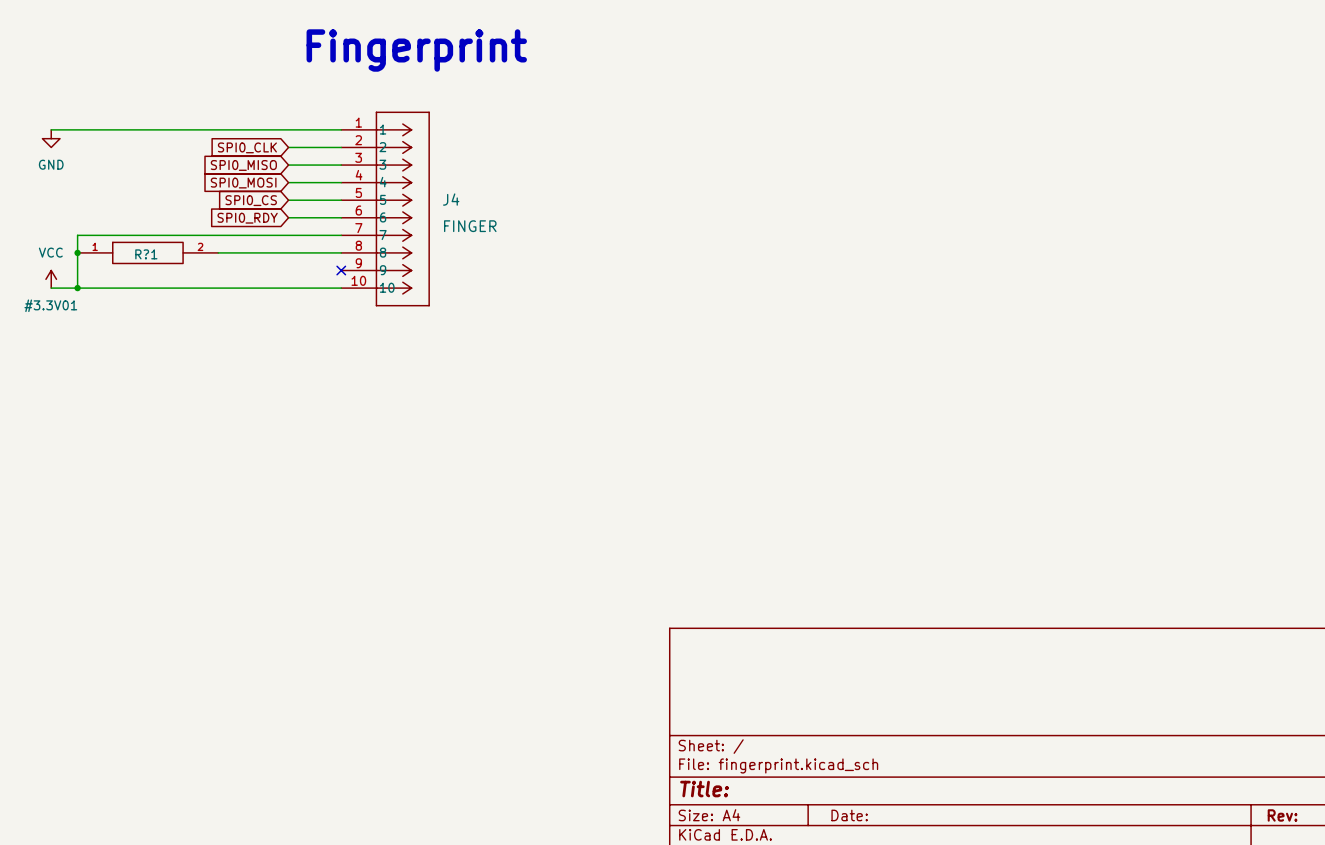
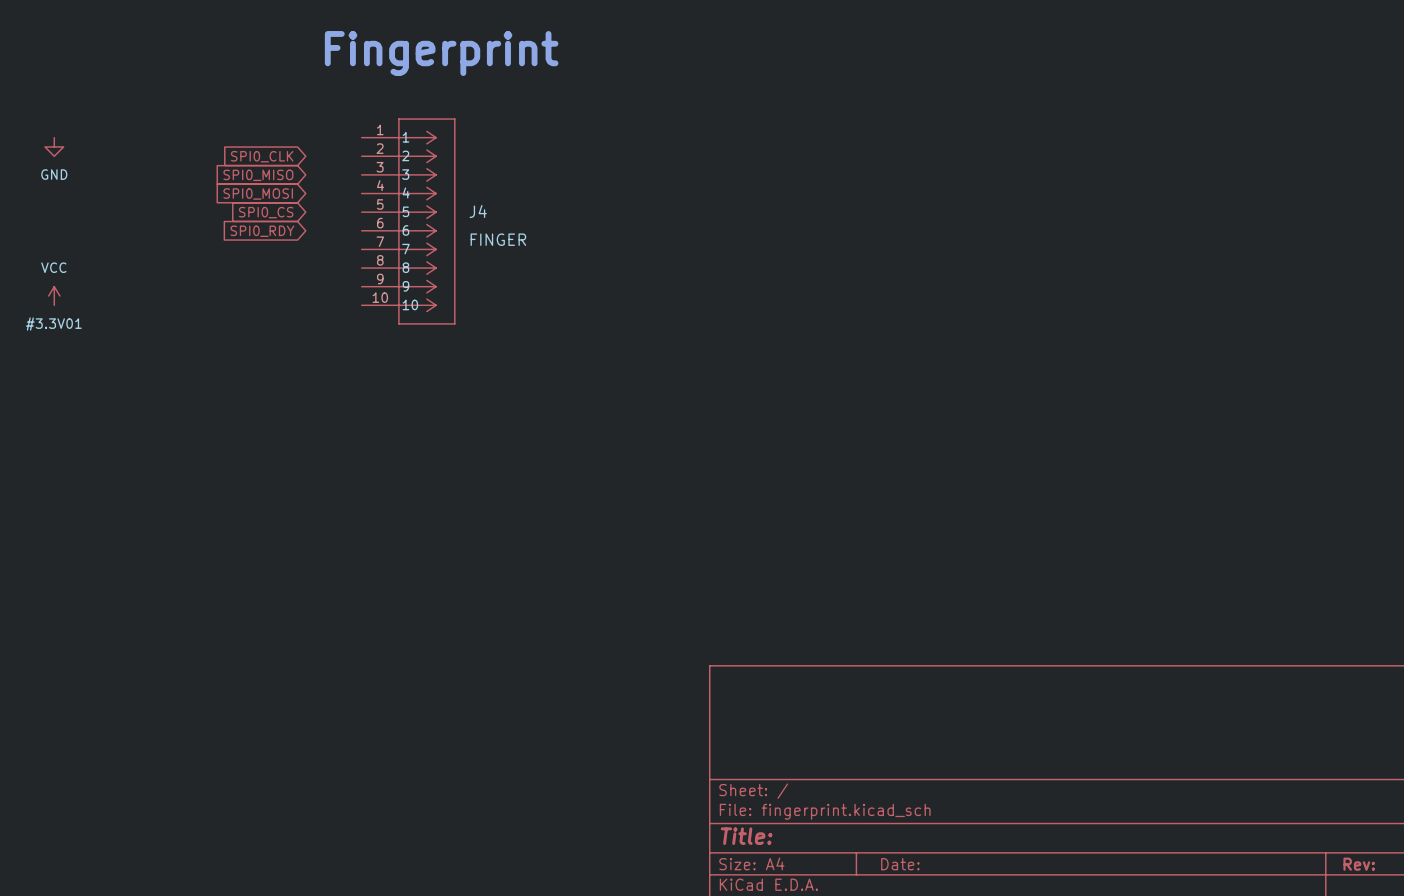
wire: (51, 129) (341, 129) -> none
wire: (288, 147) (341, 147) -> none
wire: (288, 165) (341, 165) -> none
wire: (288, 182) (341, 182) -> none
wire: (288, 200) (341, 200) -> none
wire: (288, 217) (341, 217) -> none
wire: (341, 235) (77, 235) (77, 288) -> none
junction: (77, 252) -> none
R?1: (147, 252) -> none
wire: (218, 252) (341, 252) -> none
no-connect mark: (341, 270) -> none
wire: (51, 288) (341, 288) -> none
junction: (77, 288) -> none

